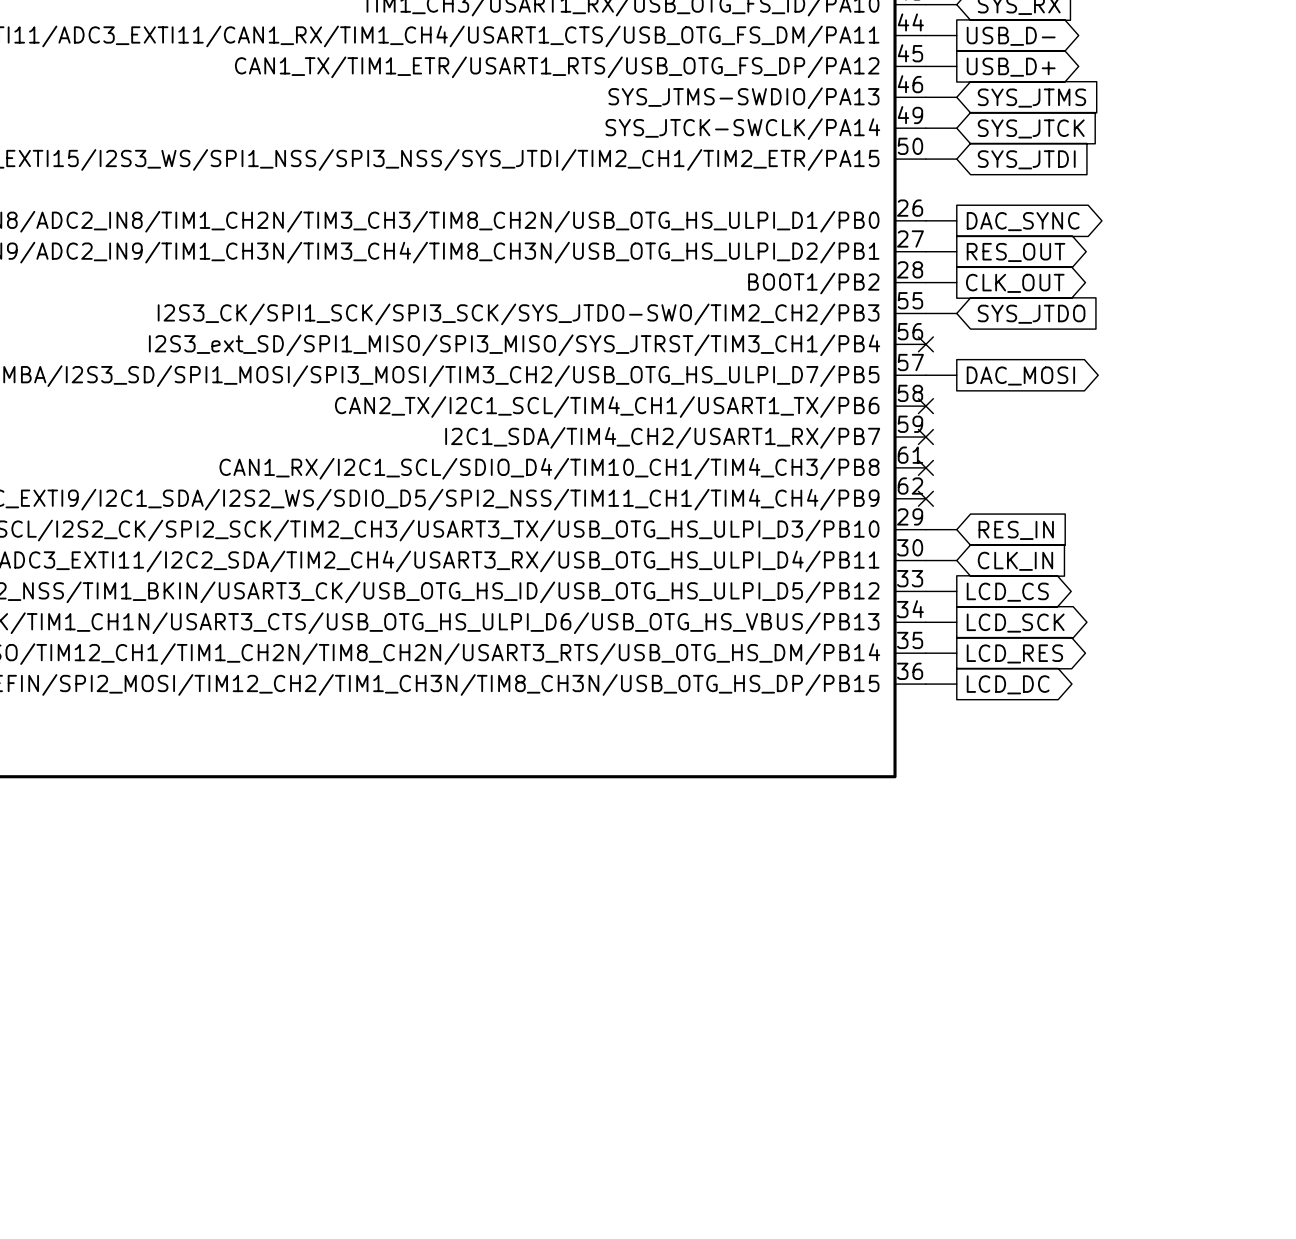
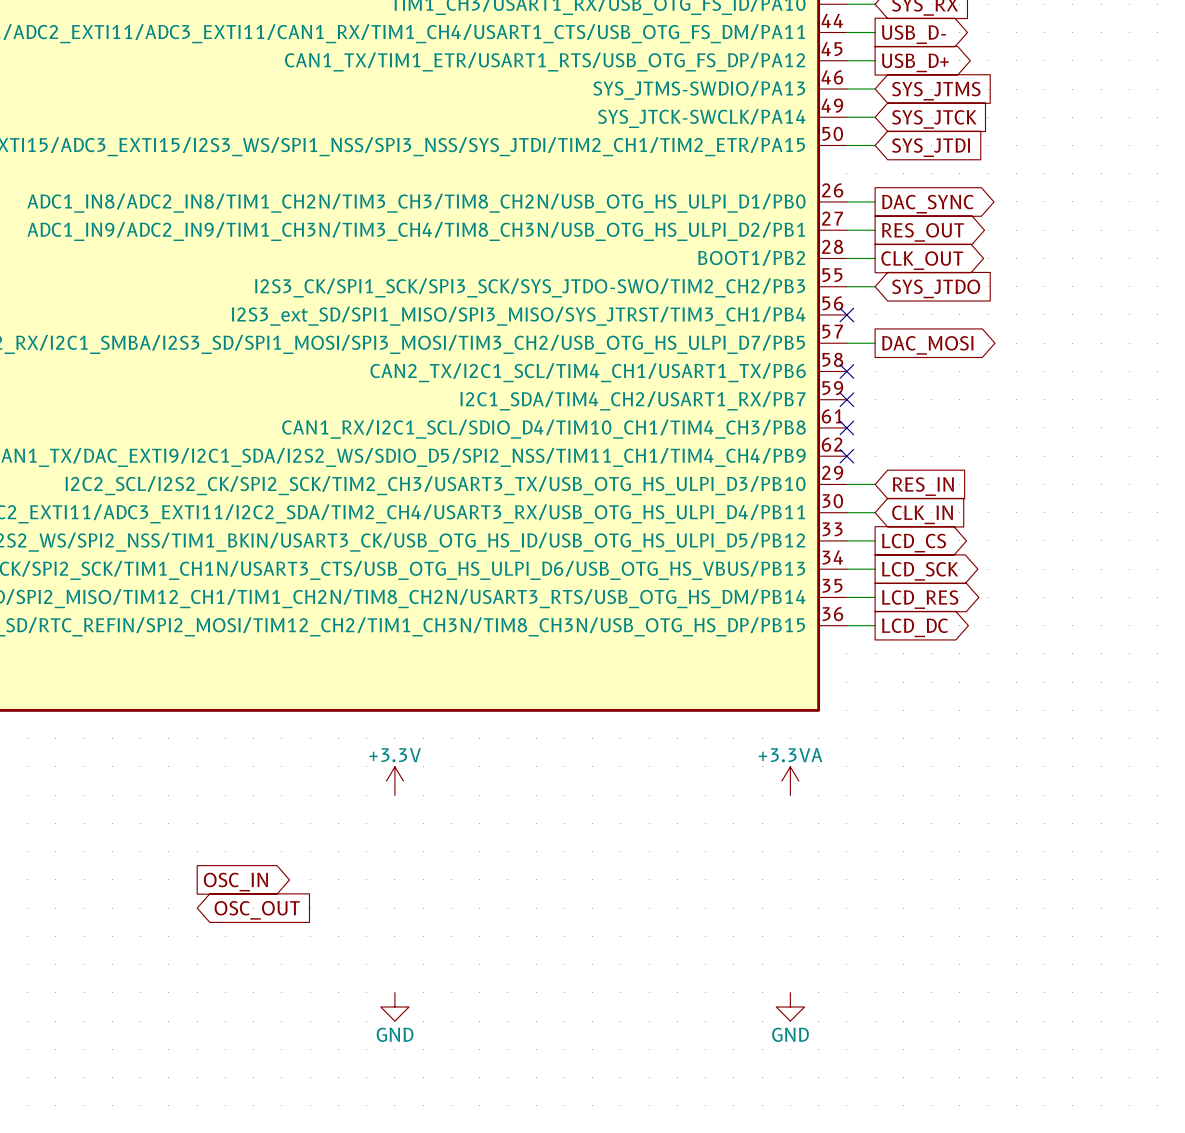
power symbol: none -> +3.3V (394, 781)
power symbol: none -> +3.3VA (790, 781)
global label: none -> OSC_IN (235, 882)
global label: none -> OSC_OUT (257, 910)
power symbol: none -> GND (394, 1007)
power symbol: none -> GND (790, 1007)

